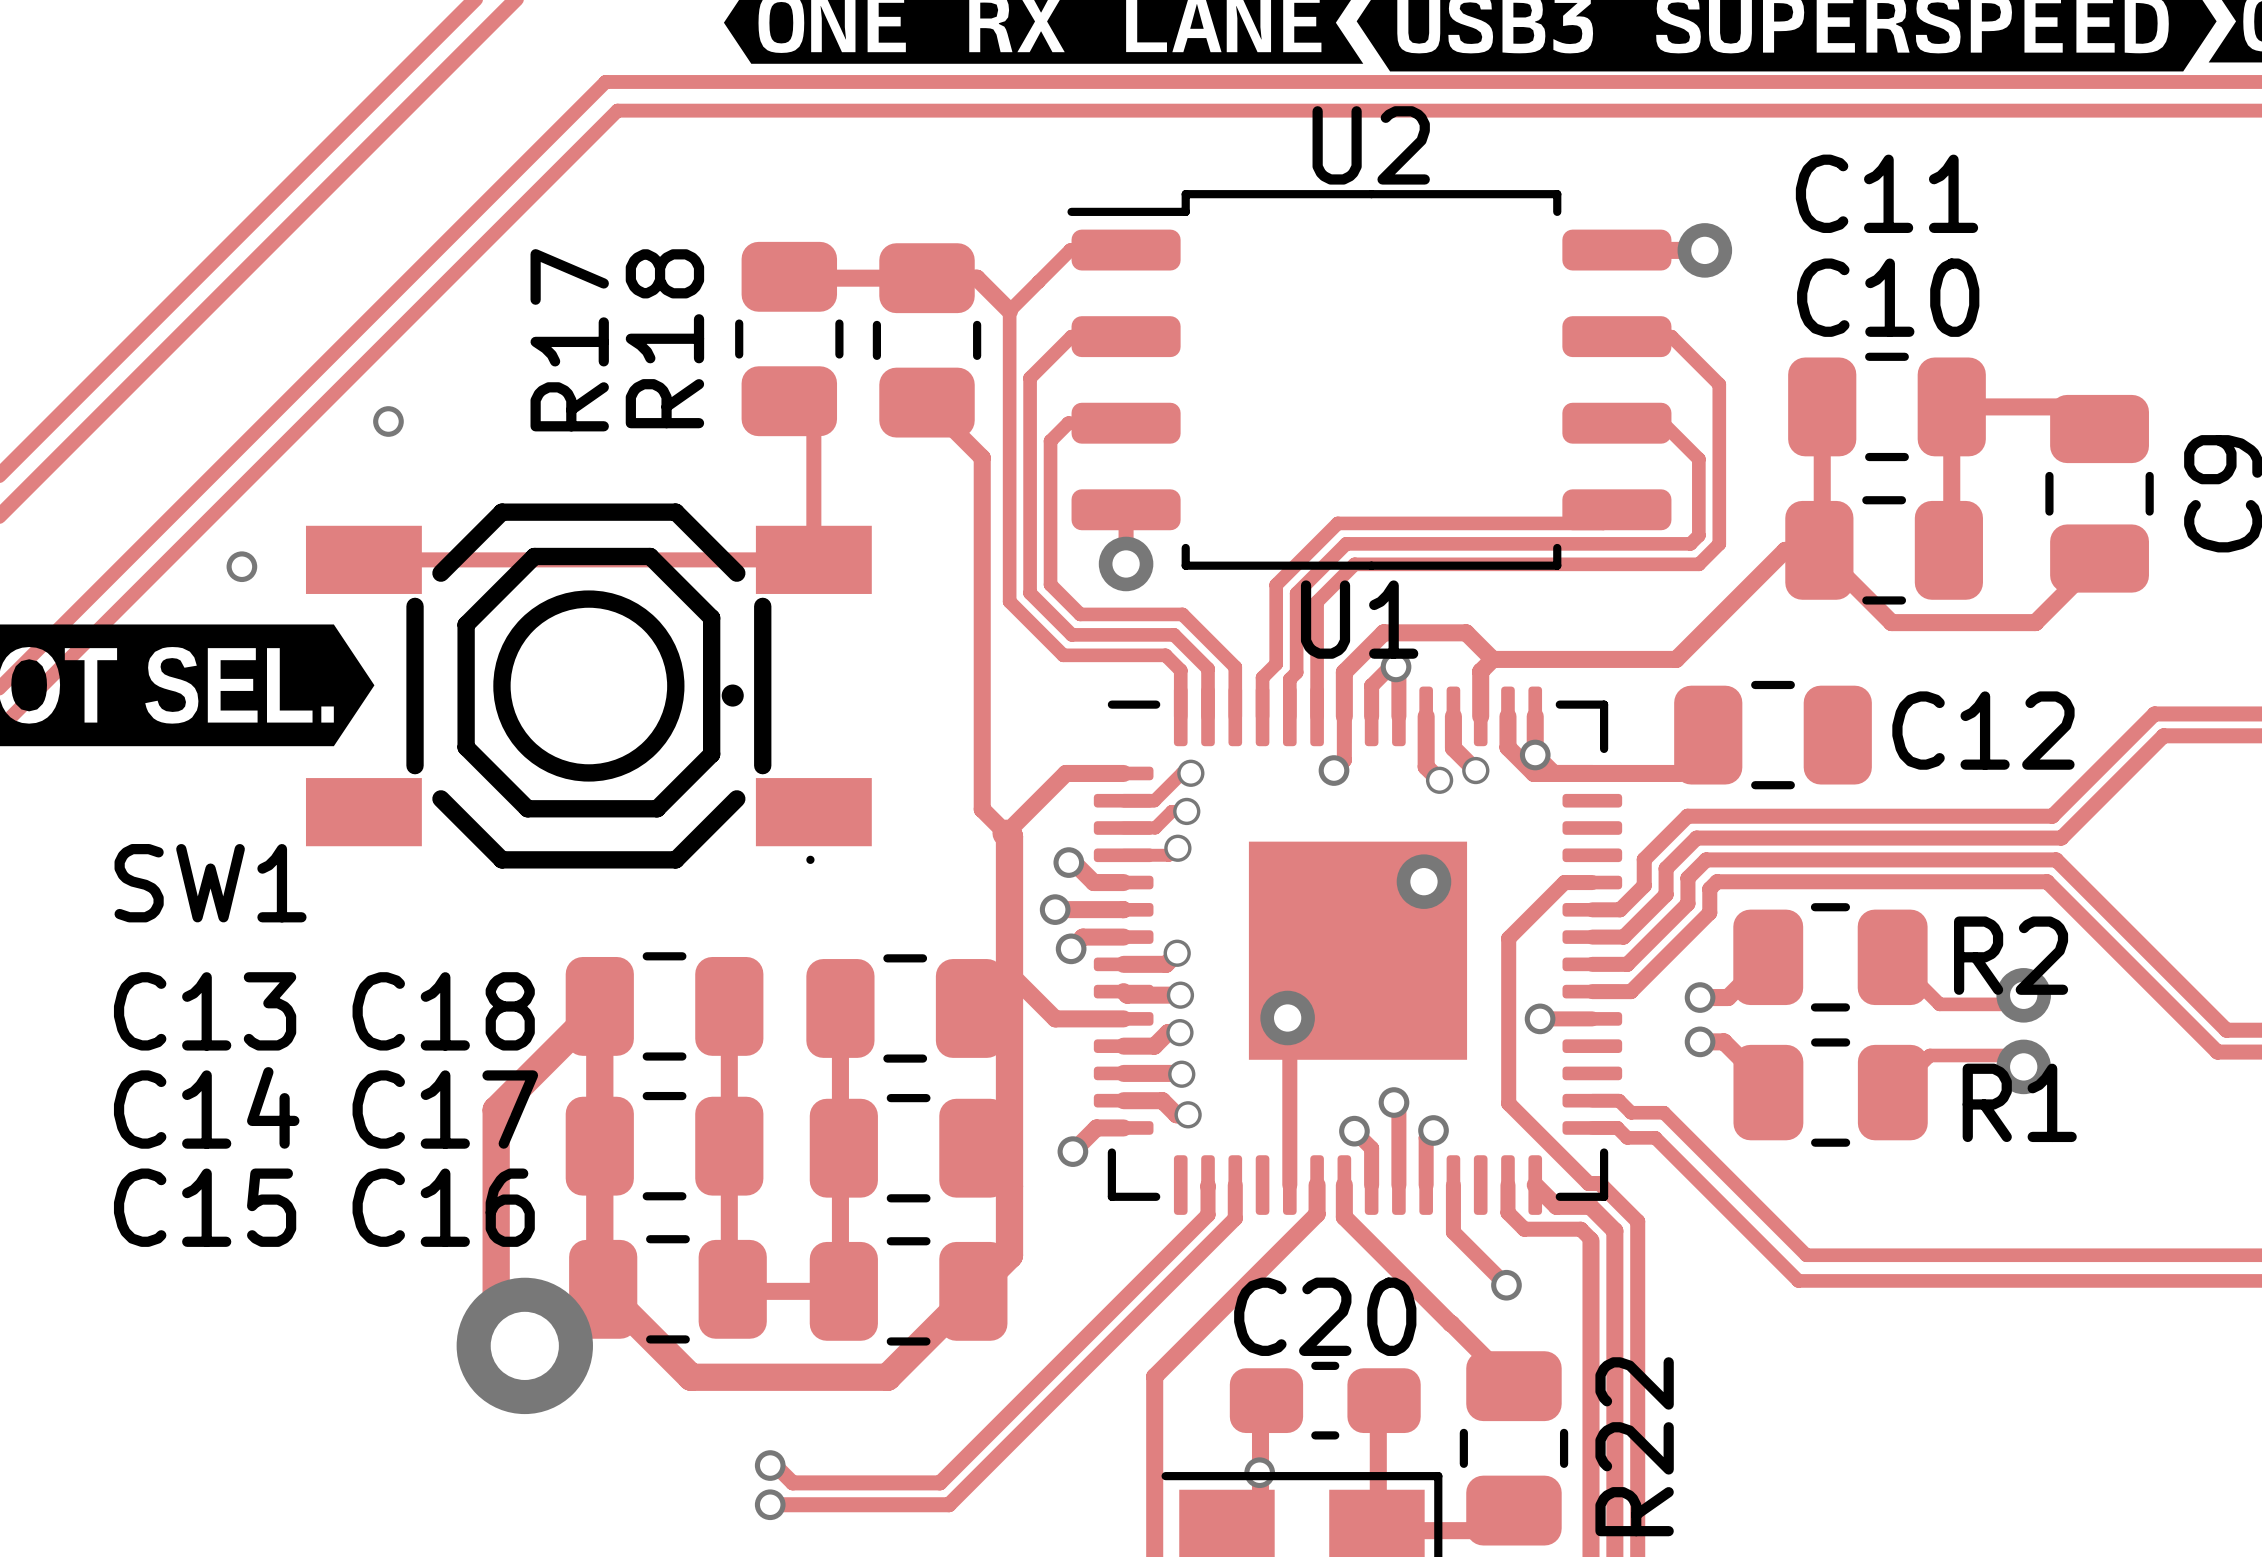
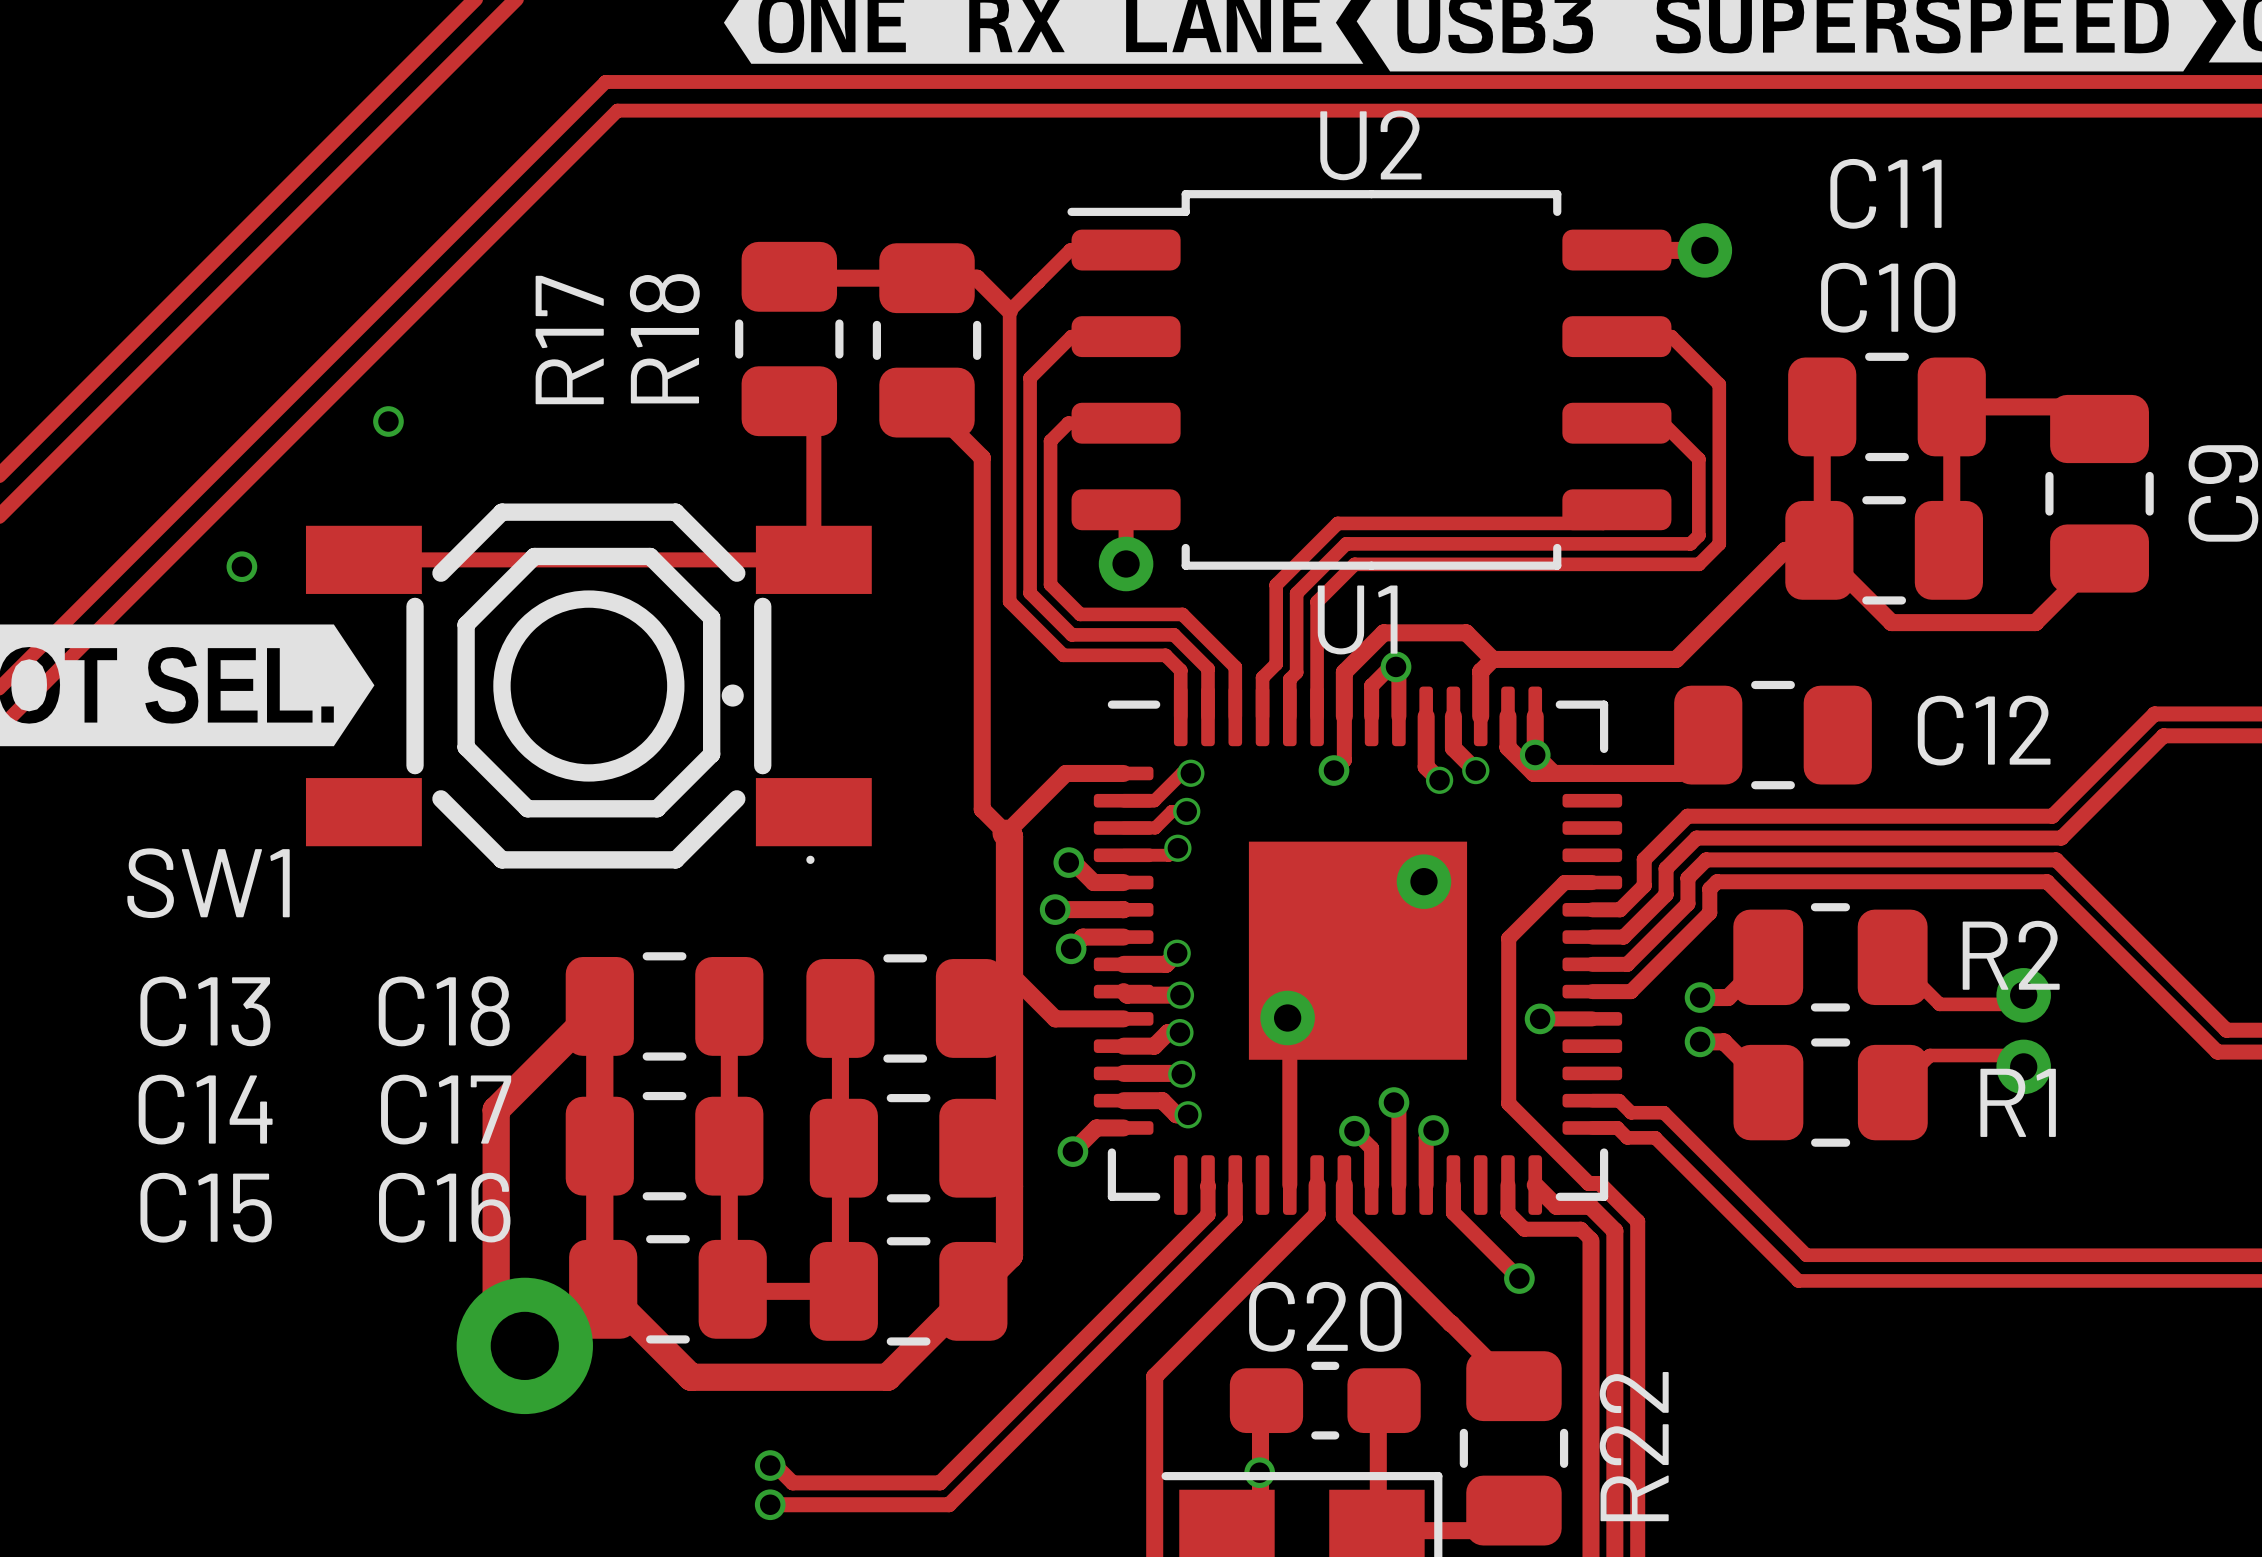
track: (1453, 1212) (1453, 1232) (1506, 1285) -> (1453, 1212) (1519, 1278)
via position: (1506, 1285) -> (1519, 1278)

